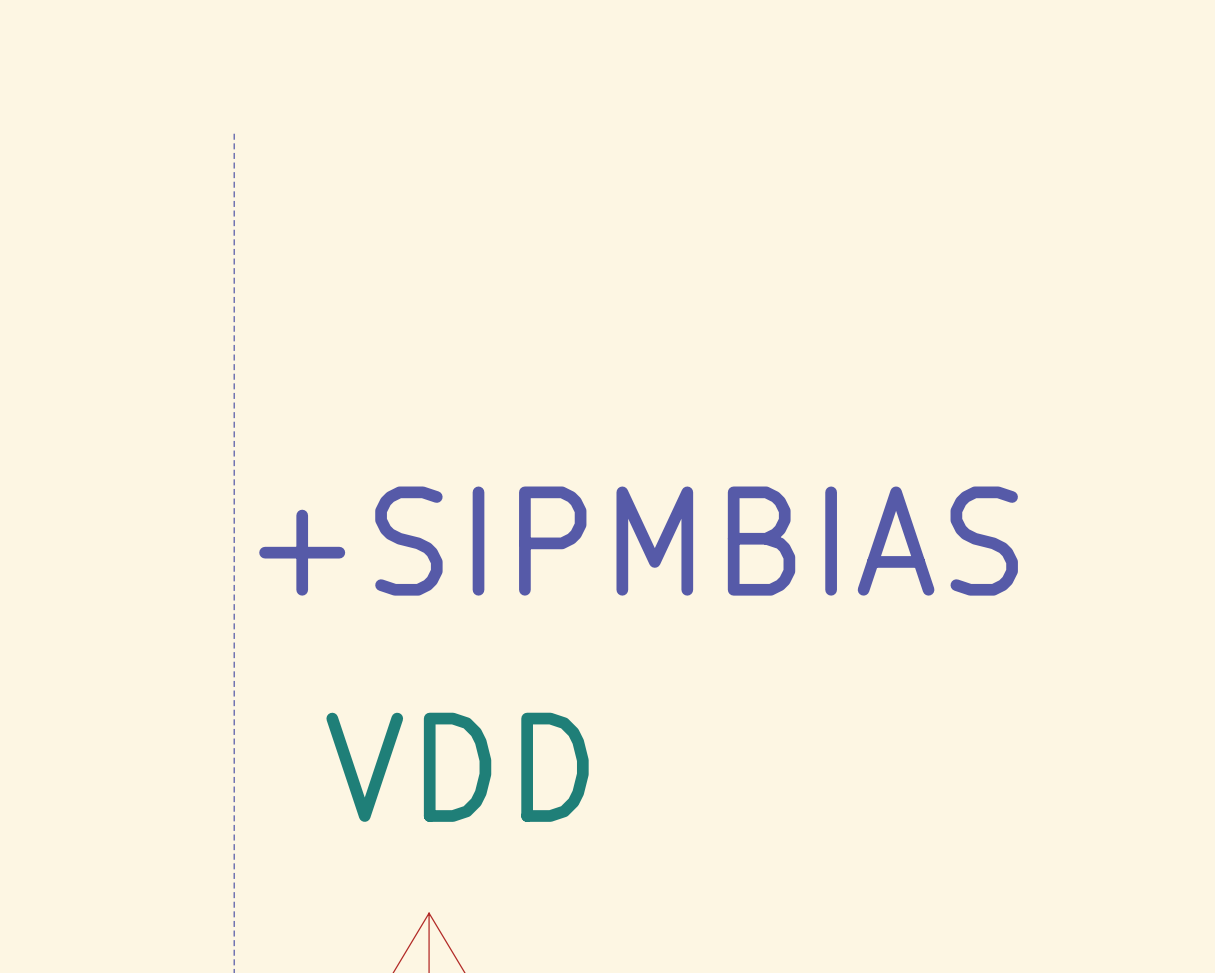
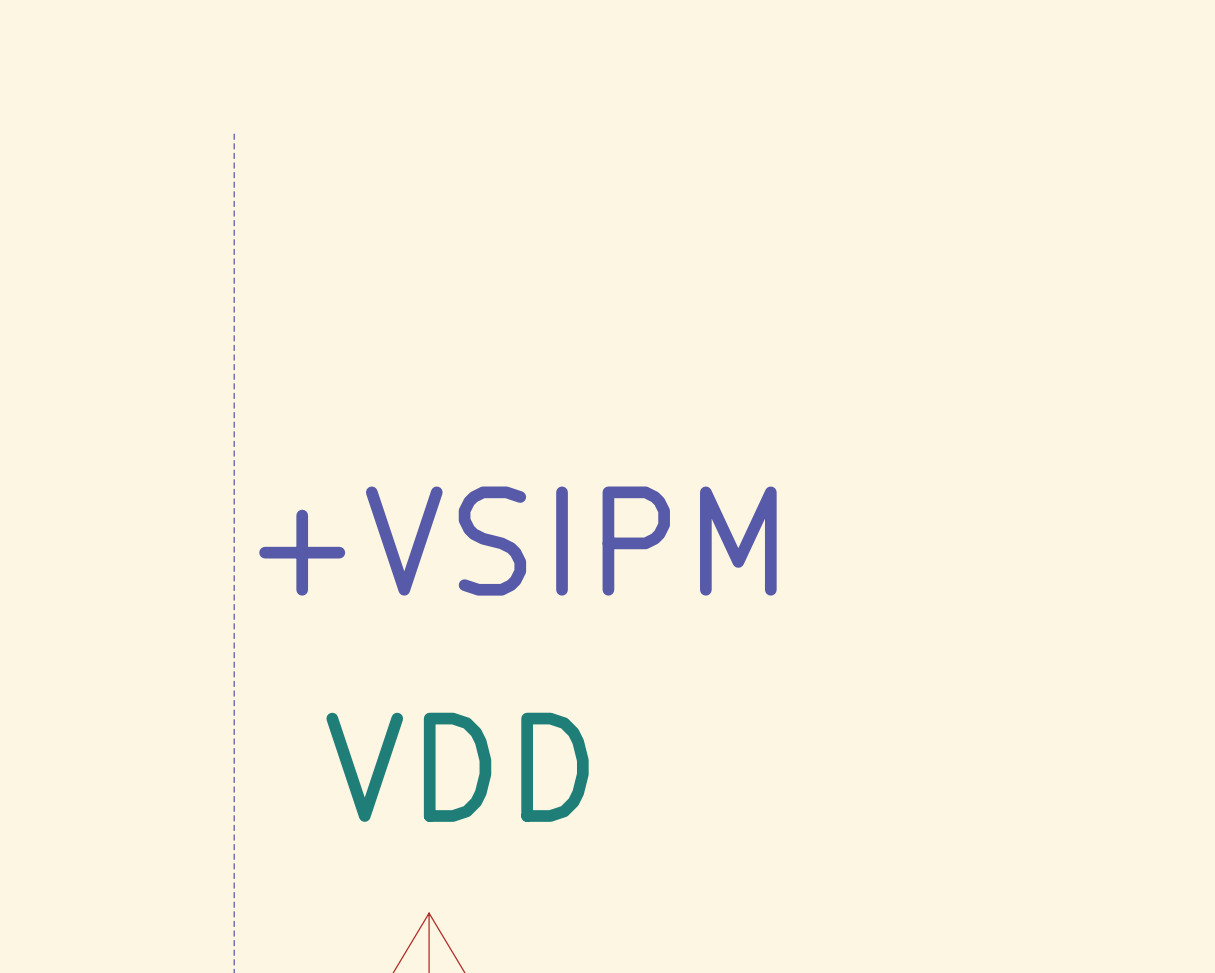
text: +SIPMBIAS (638, 541) -> +VSIPM (517, 541)

